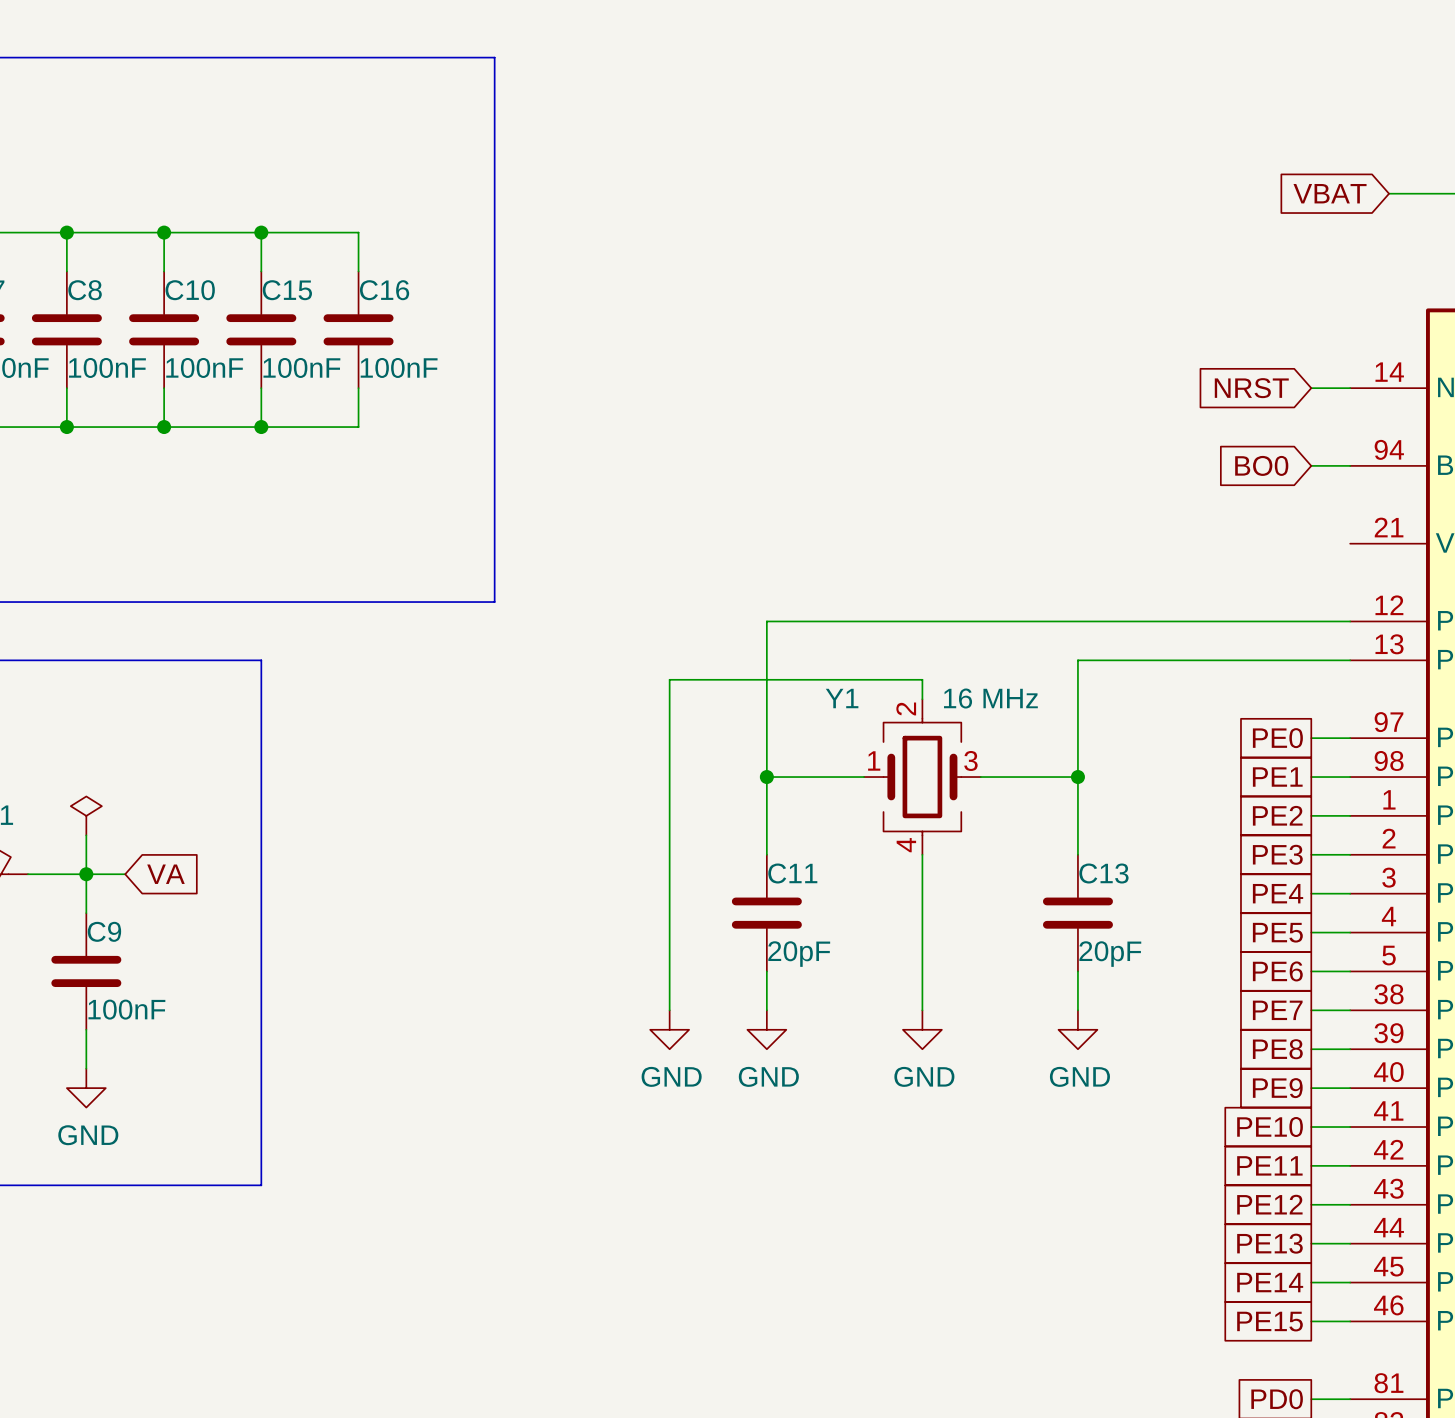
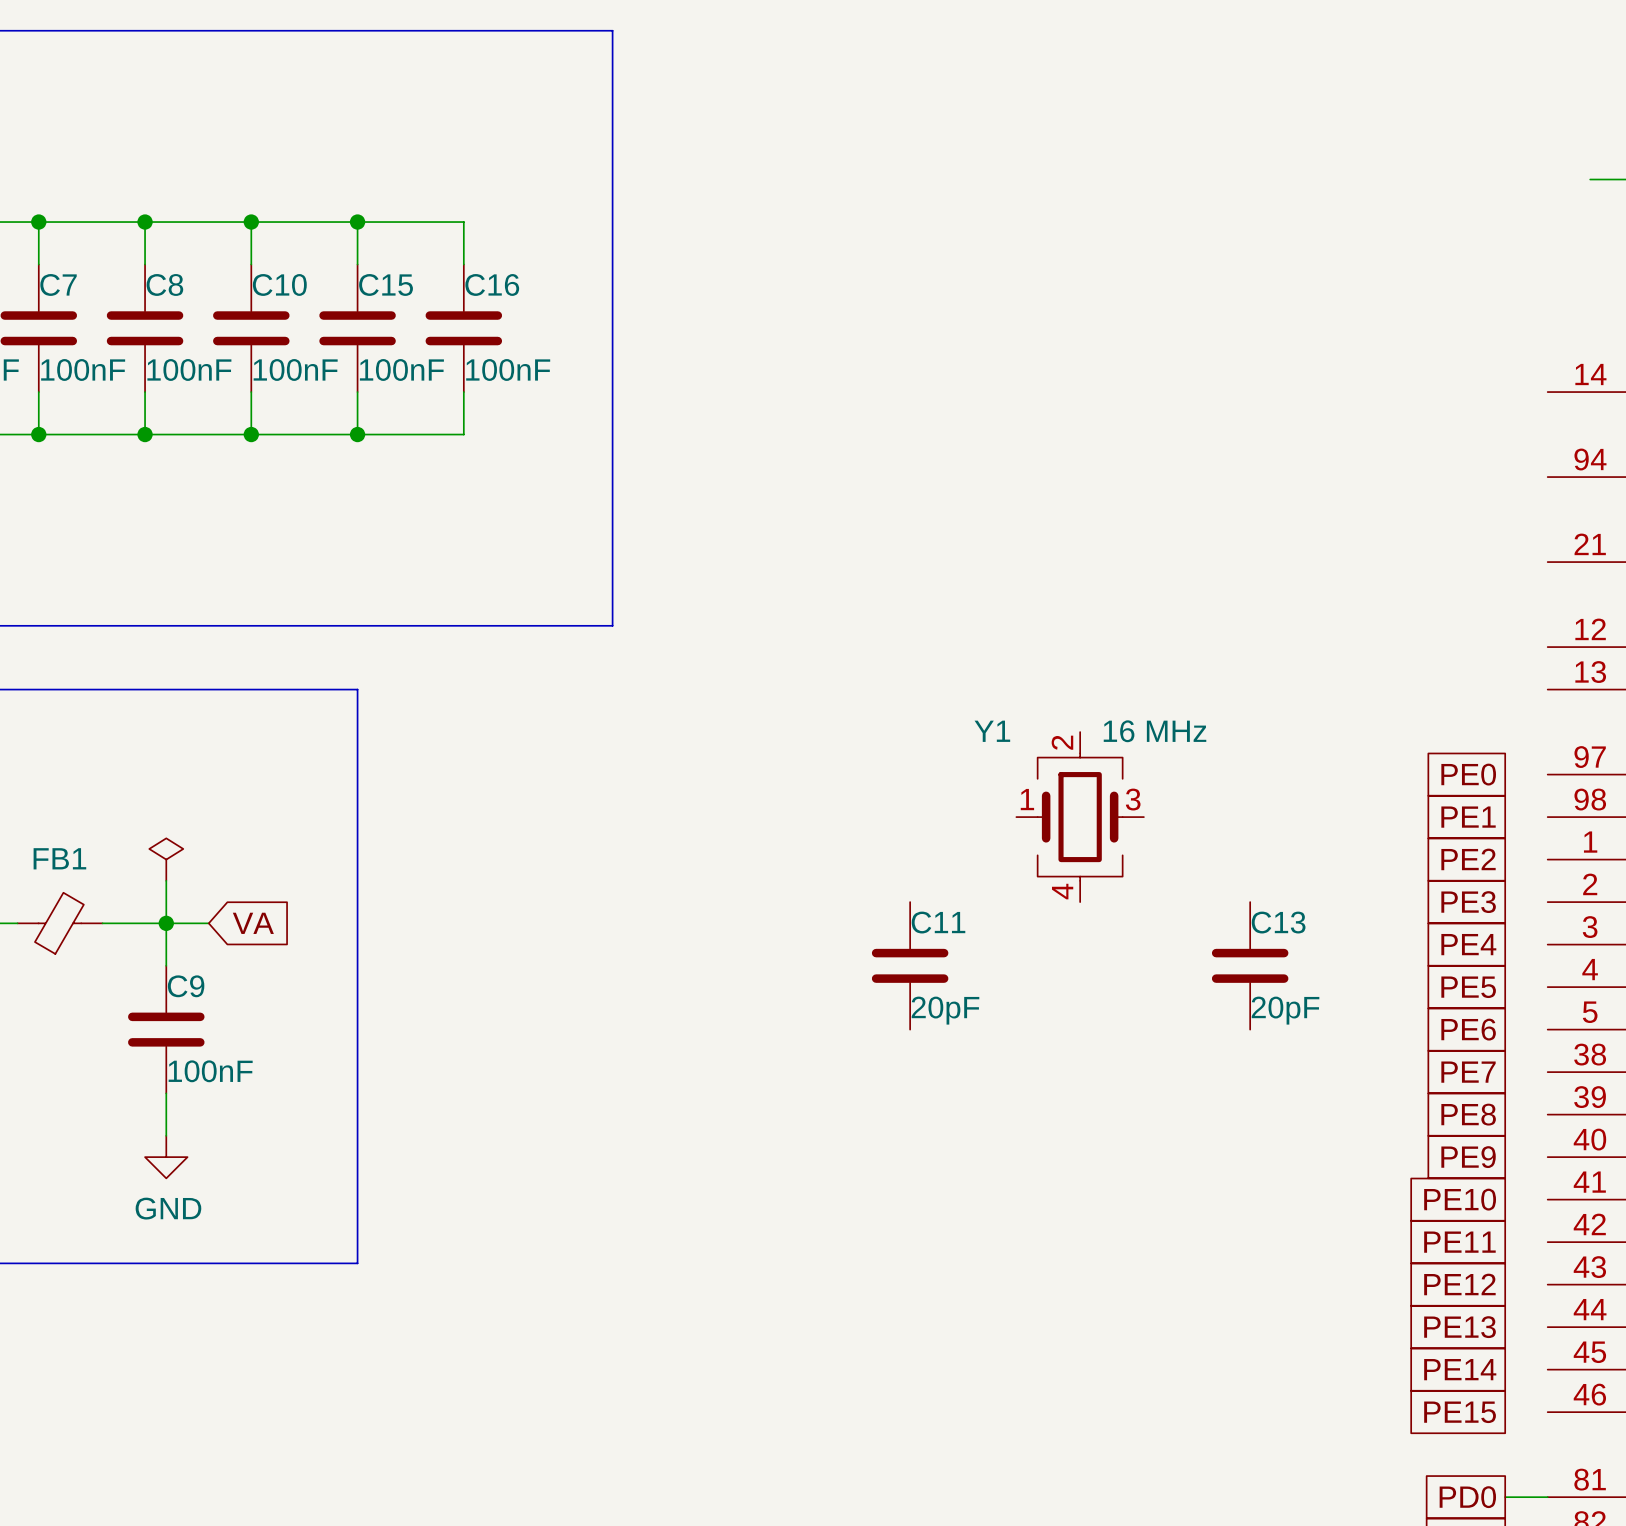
global label: VBAT (1330, 193) -> none
global label: NRST (1251, 388) -> none
wire: (1311, 388) (1350, 388) -> none
global label: BO0 (1261, 465) -> none
wire: (1311, 465) (1350, 465) -> none
wire: (1350, 621) (766, 621) (766, 854) -> none
wire: (1350, 660) (1077, 660) (1077, 854) -> none
wire: (922, 699) (922, 679) (669, 679) (669, 1010) -> none
wire: (1311, 738) (1350, 738) -> none
wire: (766, 777) (864, 777) -> none
junction: (766, 777) -> none
wire: (980, 777) (1077, 777) -> none
junction: (1077, 777) -> none
wire: (1311, 777) (1350, 777) -> none
wire: (1311, 815) (1350, 815) -> none
wire: (922, 854) (922, 1010) -> none
wire: (1311, 854) (1350, 854) -> none
wire: (1311, 893) (1350, 893) -> none
wire: (1311, 932) (1350, 932) -> none
wire: (766, 971) (766, 1010) -> none
wire: (1077, 971) (1077, 1010) -> none
wire: (1311, 971) (1350, 971) -> none
wire: (1311, 1010) (1350, 1010) -> none
power symbol: GND (669, 1029) -> none
power symbol: GND (766, 1029) -> none
power symbol: GND (922, 1029) -> none
power symbol: GND (1077, 1029) -> none
wire: (1311, 1049) (1350, 1049) -> none
wire: (1311, 1088) (1350, 1088) -> none
wire: (1311, 1127) (1350, 1127) -> none
wire: (1311, 1165) (1350, 1165) -> none
wire: (1311, 1204) (1350, 1204) -> none
wire: (1311, 1243) (1350, 1243) -> none
wire: (1311, 1282) (1350, 1282) -> none
wire: (1311, 1321) (1350, 1321) -> none

